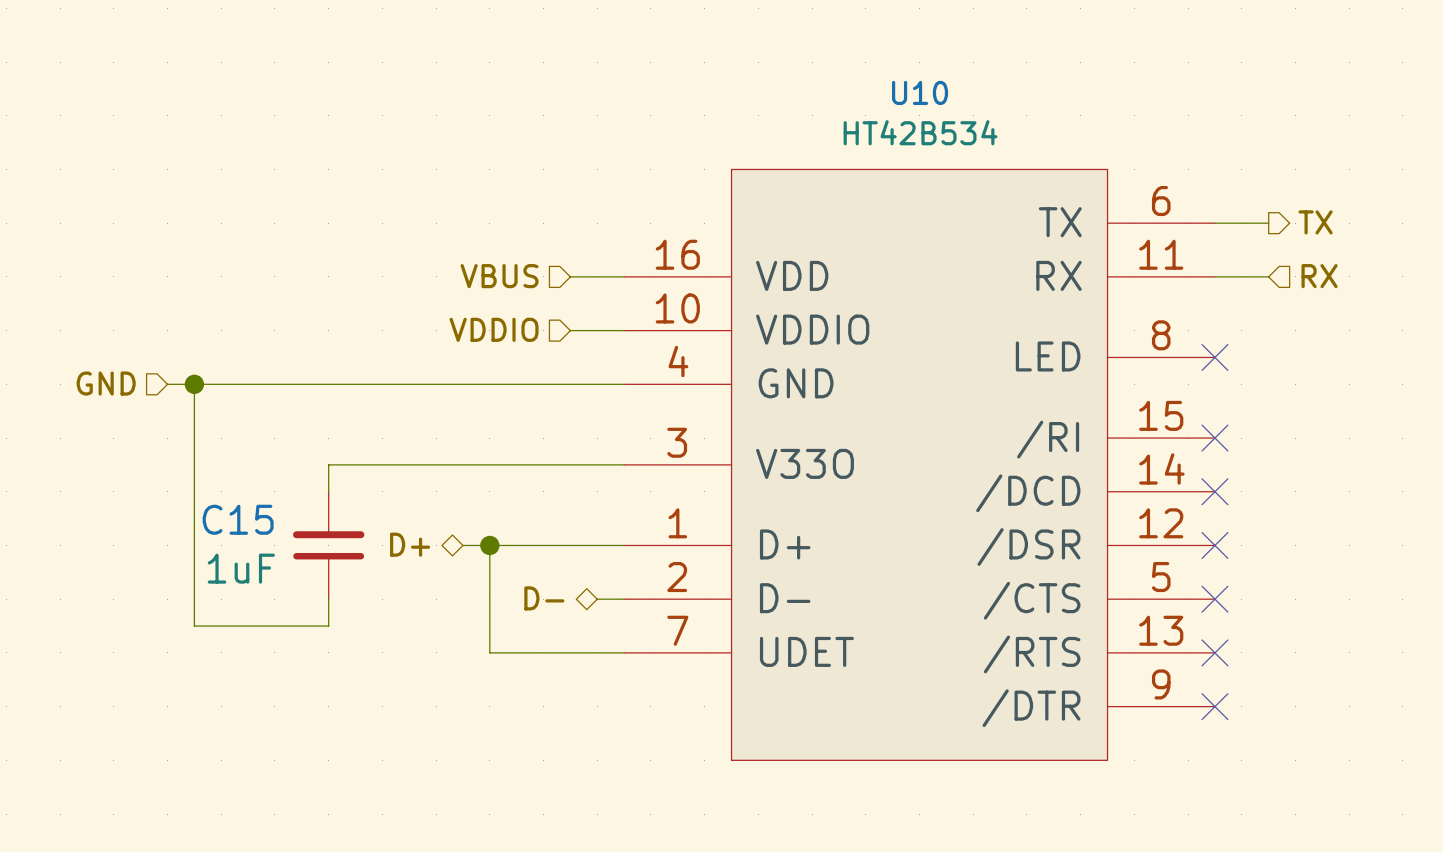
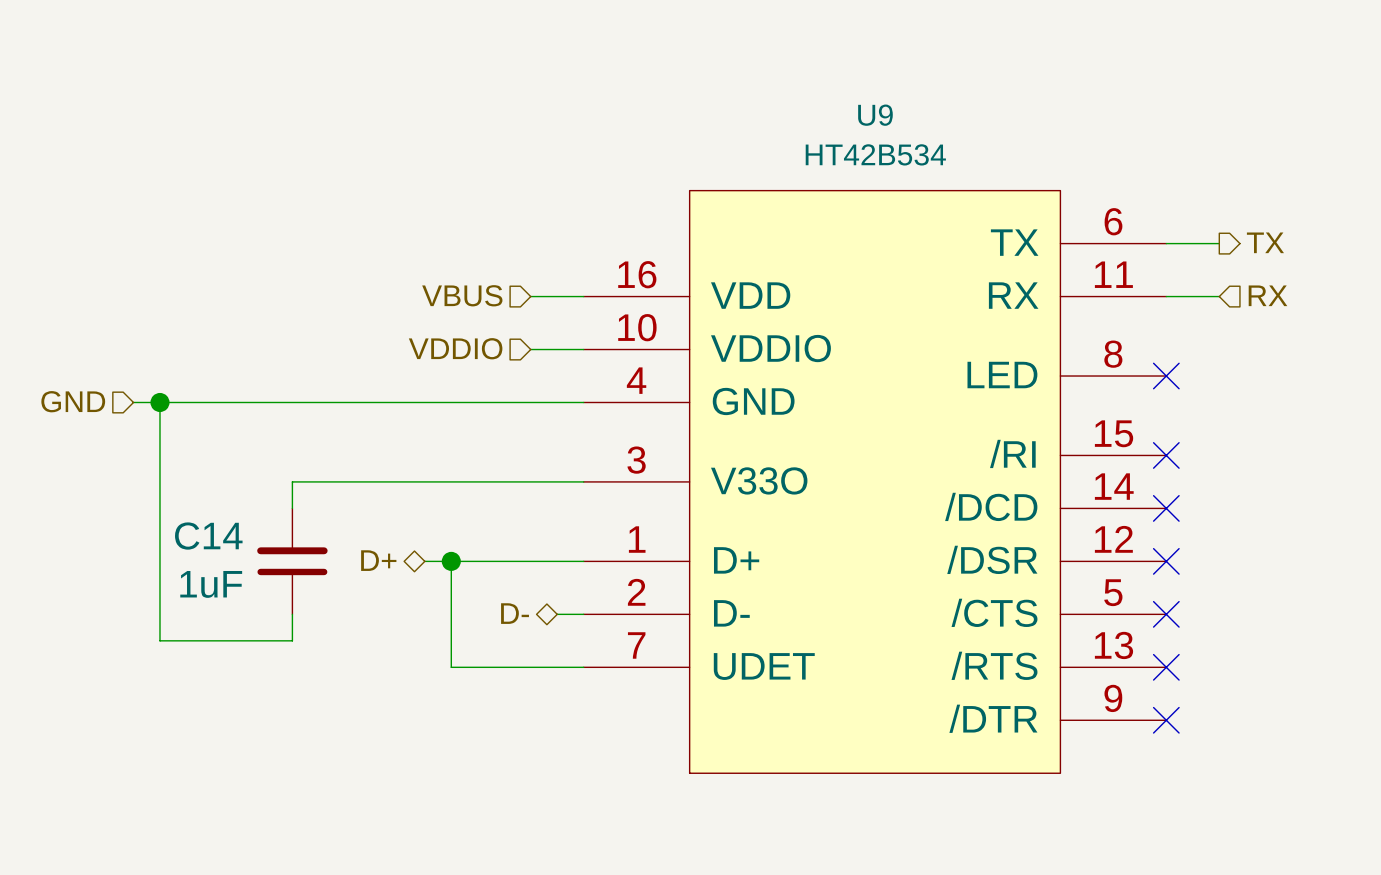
U10 name: U10 (920, 92) -> U9 (875, 115)
C15 name: C15 (238, 519) -> C14 (208, 536)

